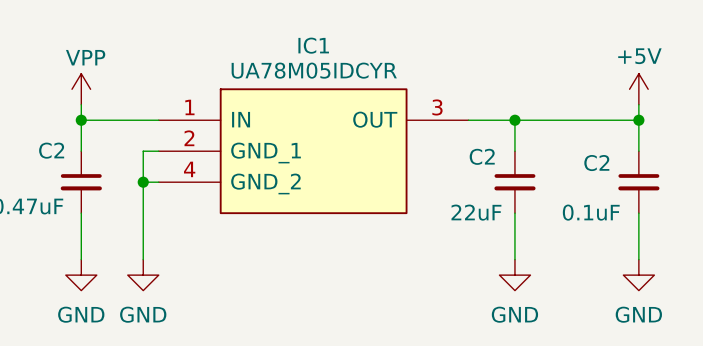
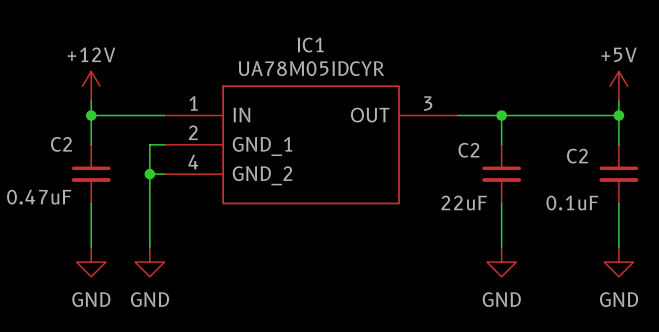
power symbol: VPP (81, 89) -> +12V (91, 86)

